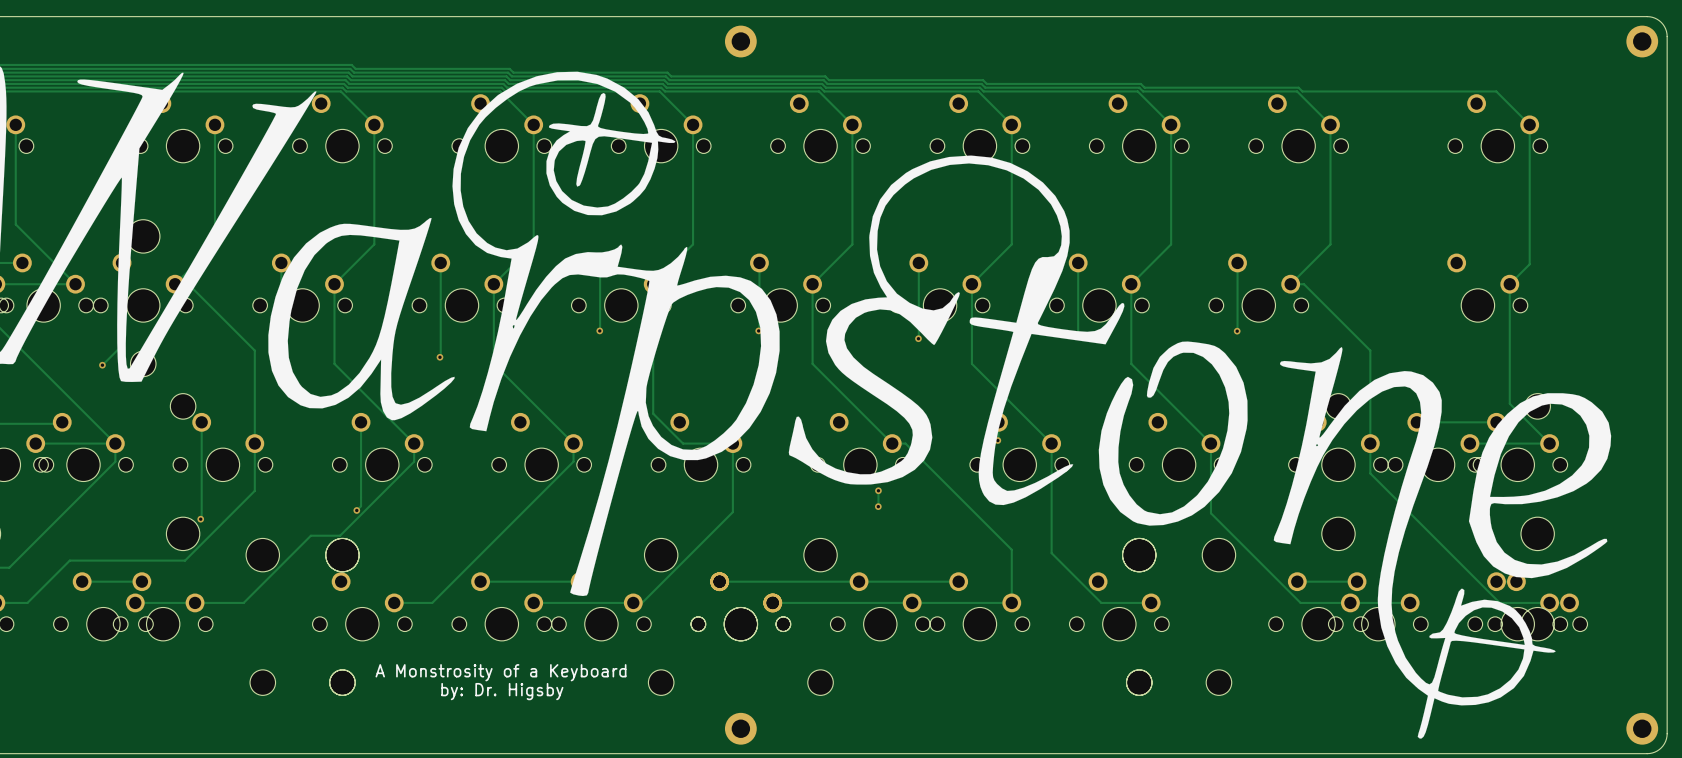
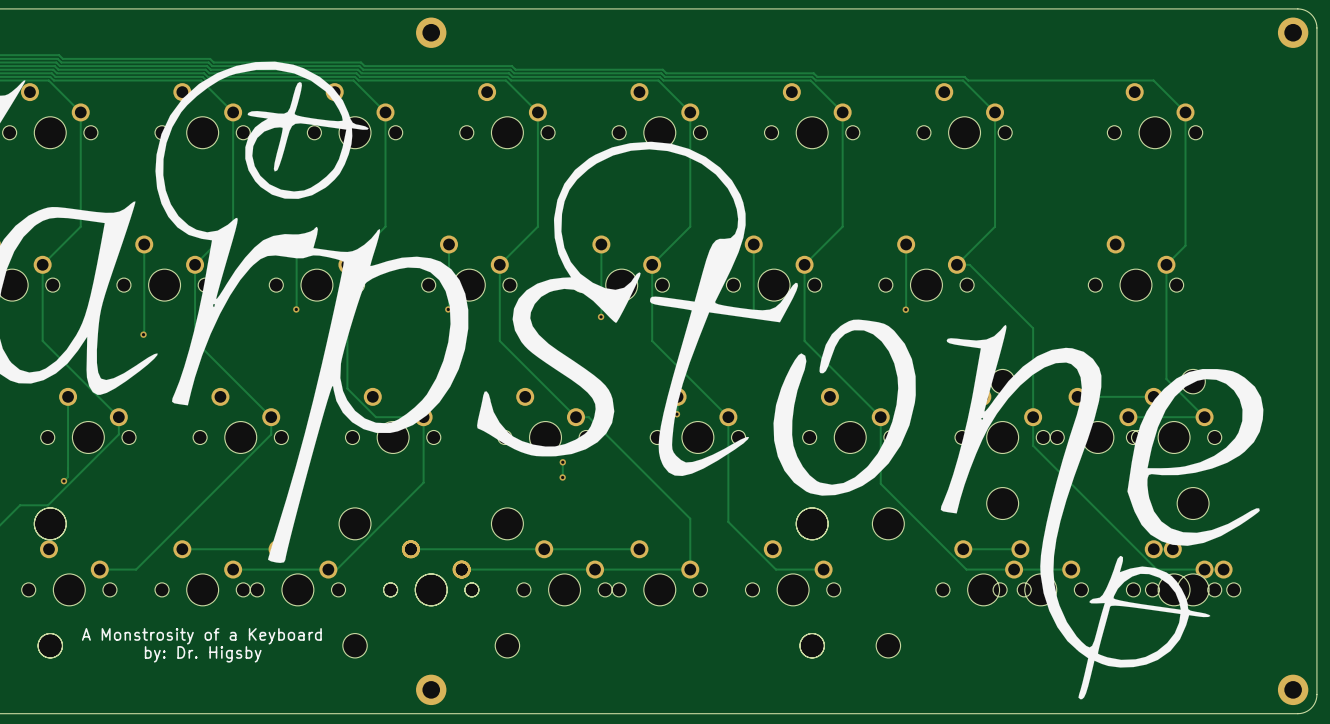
part: none -> (1135, 268)

